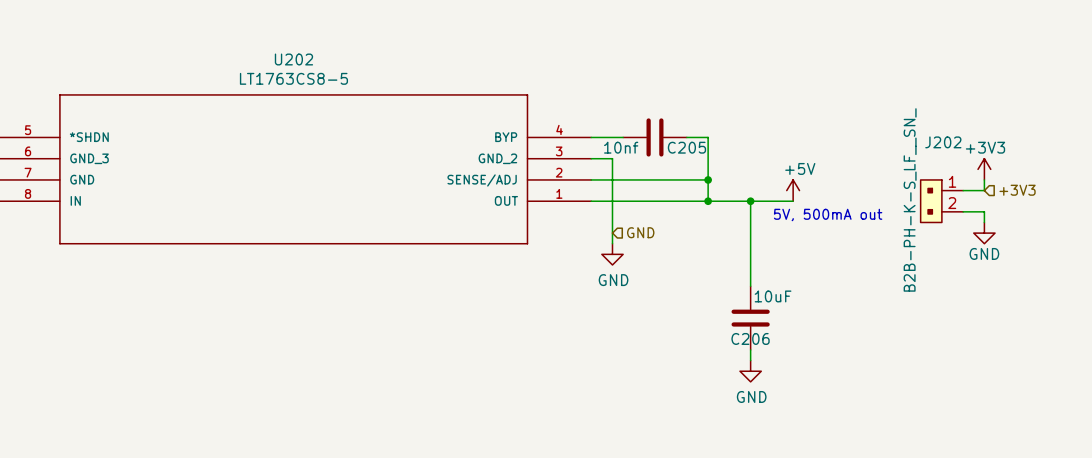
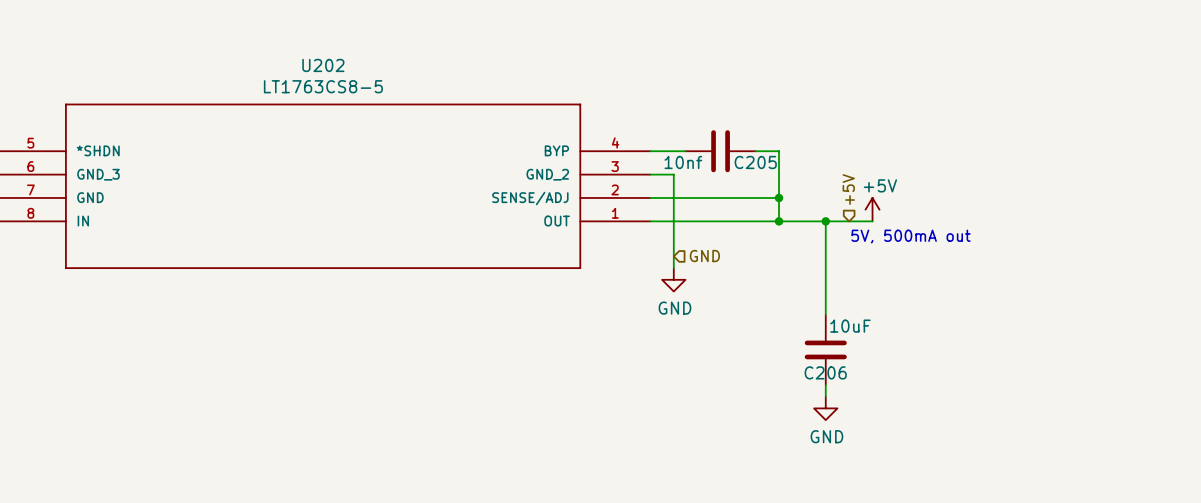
power symbol: +3V3 (984, 169) -> none
hierarchical label: none -> +5V (848, 189)
wire: (984, 179) (984, 190) (963, 190) -> none
hierarchical label: +3V3 (1017, 190) -> none
J202: B2B-PH-K-S_LF__SN_ (941, 201) -> none
wire: (963, 211) (984, 211) (984, 222) -> none
power symbol: GND (984, 233) -> none

